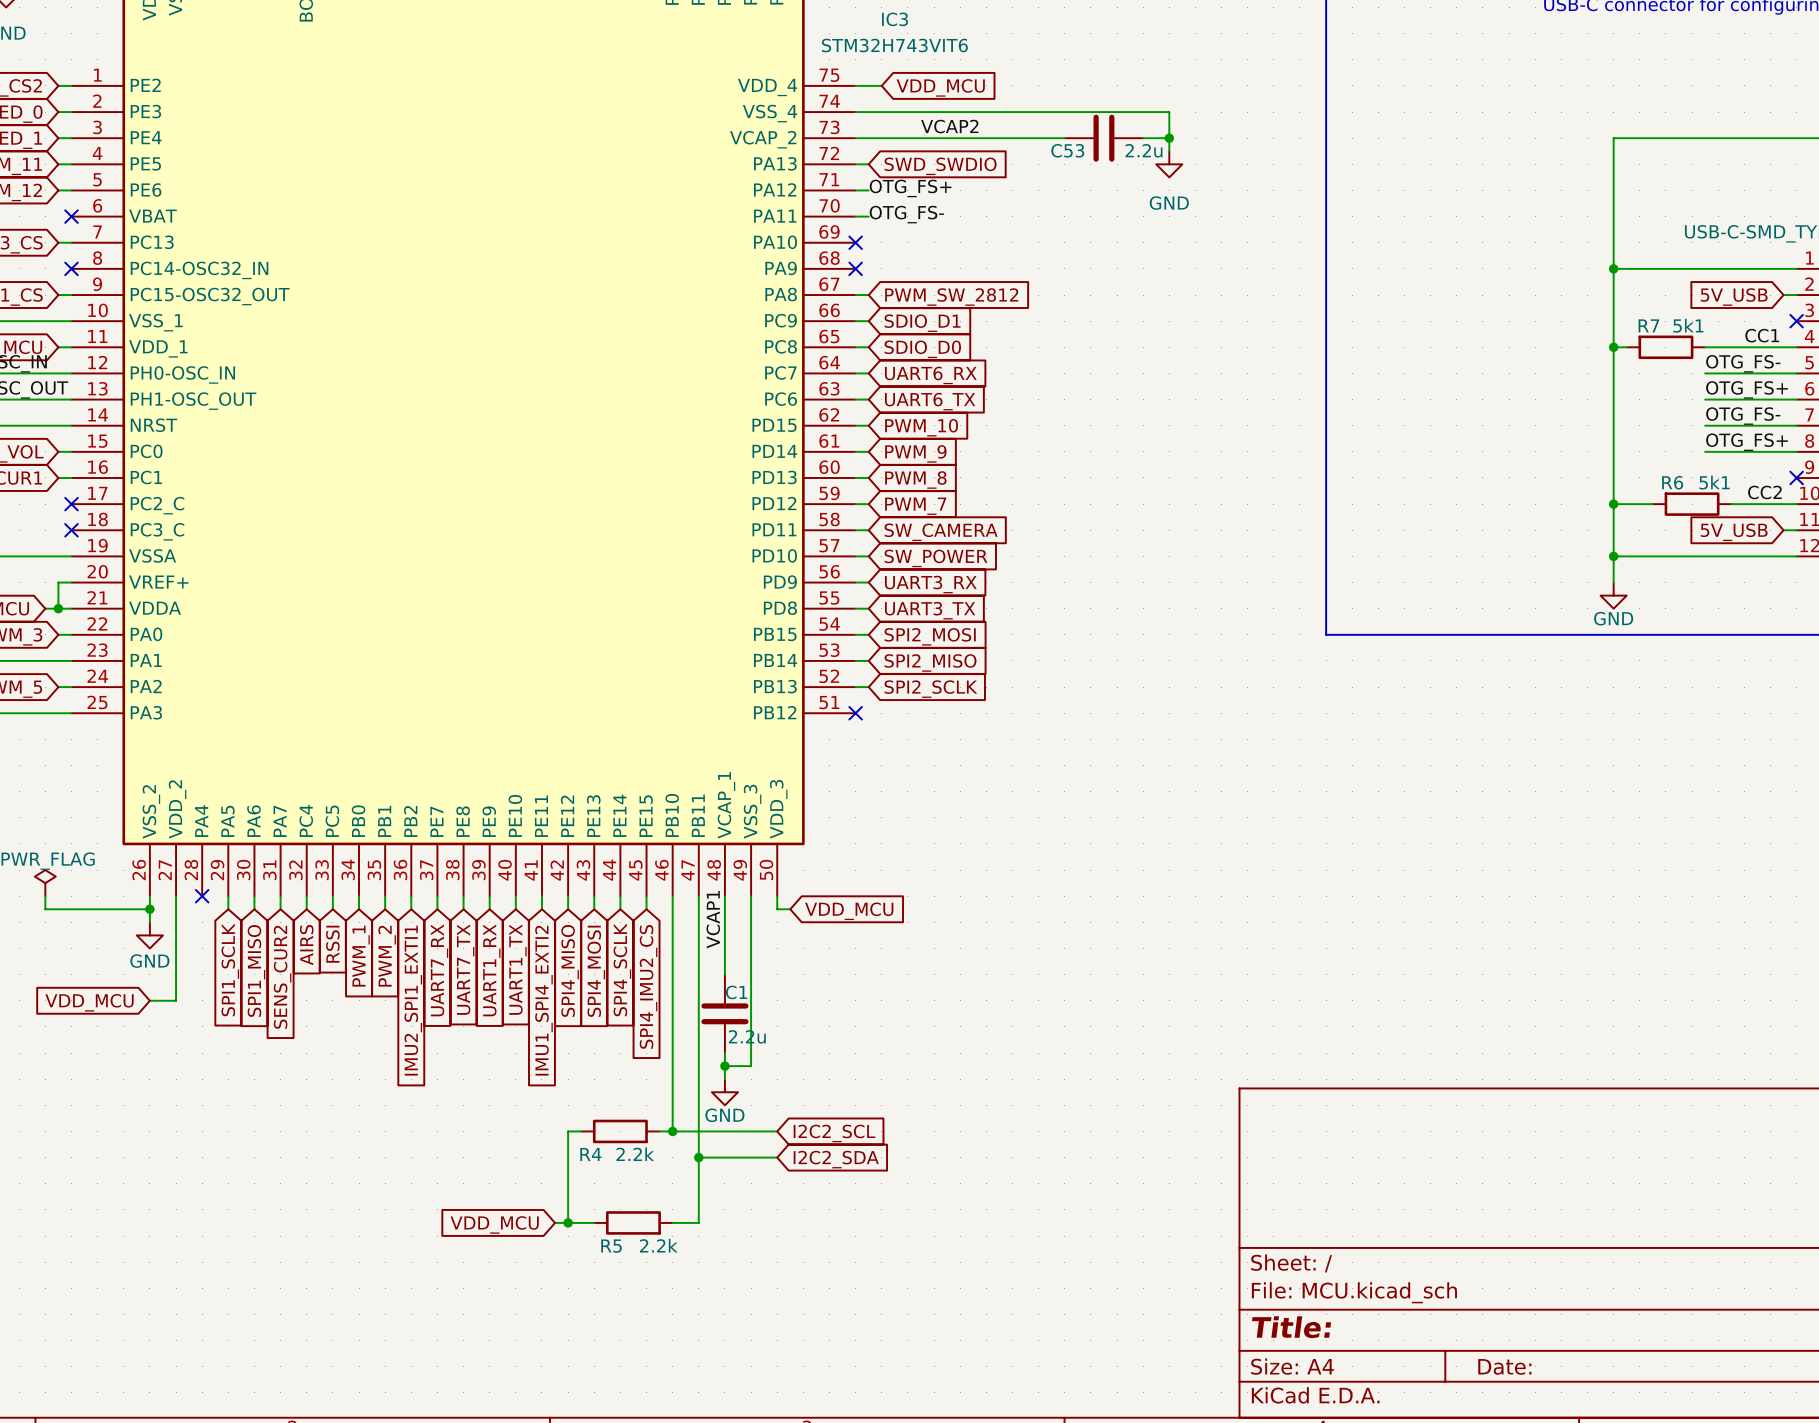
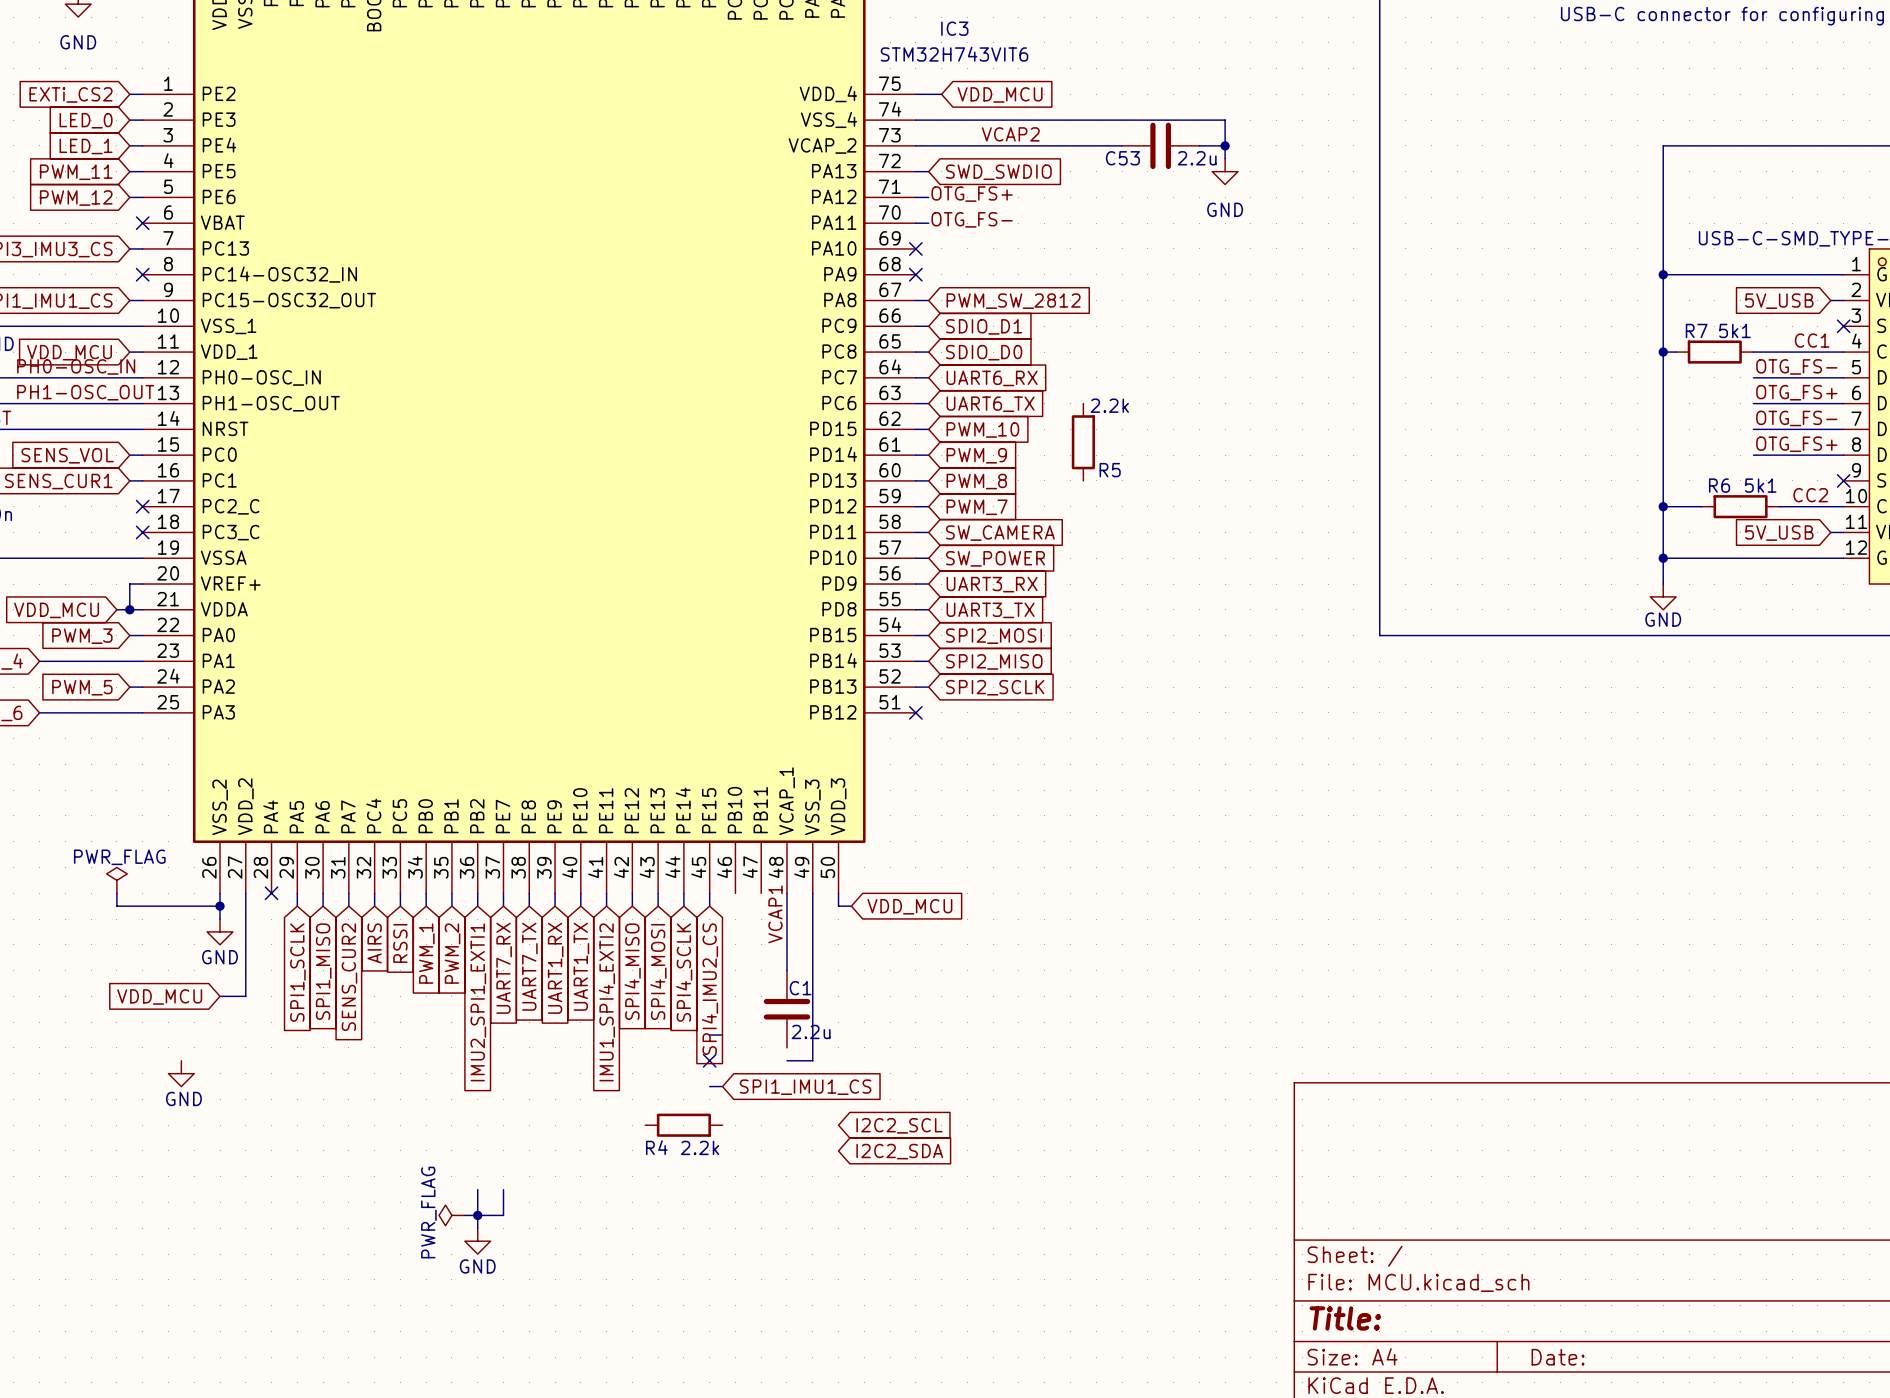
wire: (672, 896) (672, 1131) -> none
wire: (698, 896) (698, 1222) (672, 1222) -> none
wire: none -> (709, 1035) (722, 1035)
wire: (724, 1053) (724, 1079) -> none
no-connect mark: none -> (709, 1060)
junction: (724, 1066) -> none
power symbol: none -> GND (181, 1073)
wire: none -> (709, 1086) (722, 1086)
power symbol: GND (724, 1092) -> none
global label: none -> SPI1_IMU1_CS (805, 1087)
wire: (581, 1131) (568, 1131) (568, 1222) -> none
wire: (659, 1131) (777, 1131) -> none
junction: (672, 1131) -> none
wire: (698, 1157) (777, 1157) -> none
junction: (698, 1157) -> none
wire: none -> (477, 1189) (477, 1228)
wire: none -> (503, 1189) (503, 1215) (464, 1215)
power symbol: none -> PWR_FLAG (451, 1215)
junction: none -> (477, 1215)
wire: (555, 1222) (594, 1222) -> none
junction: (568, 1222) -> none
R5 rotation: 0° (633, 1222) -> 90° clockwise (1083, 442)
R5 position: (633, 1222) -> (1083, 442)
global label: VDD_MCU (494, 1224) -> none
R5 value position: 2.2k (658, 1245) -> 2.2k (1109, 405)
R5 name position: R5 (611, 1246) -> R5 (1110, 470)
power symbol: none -> GND (477, 1241)

